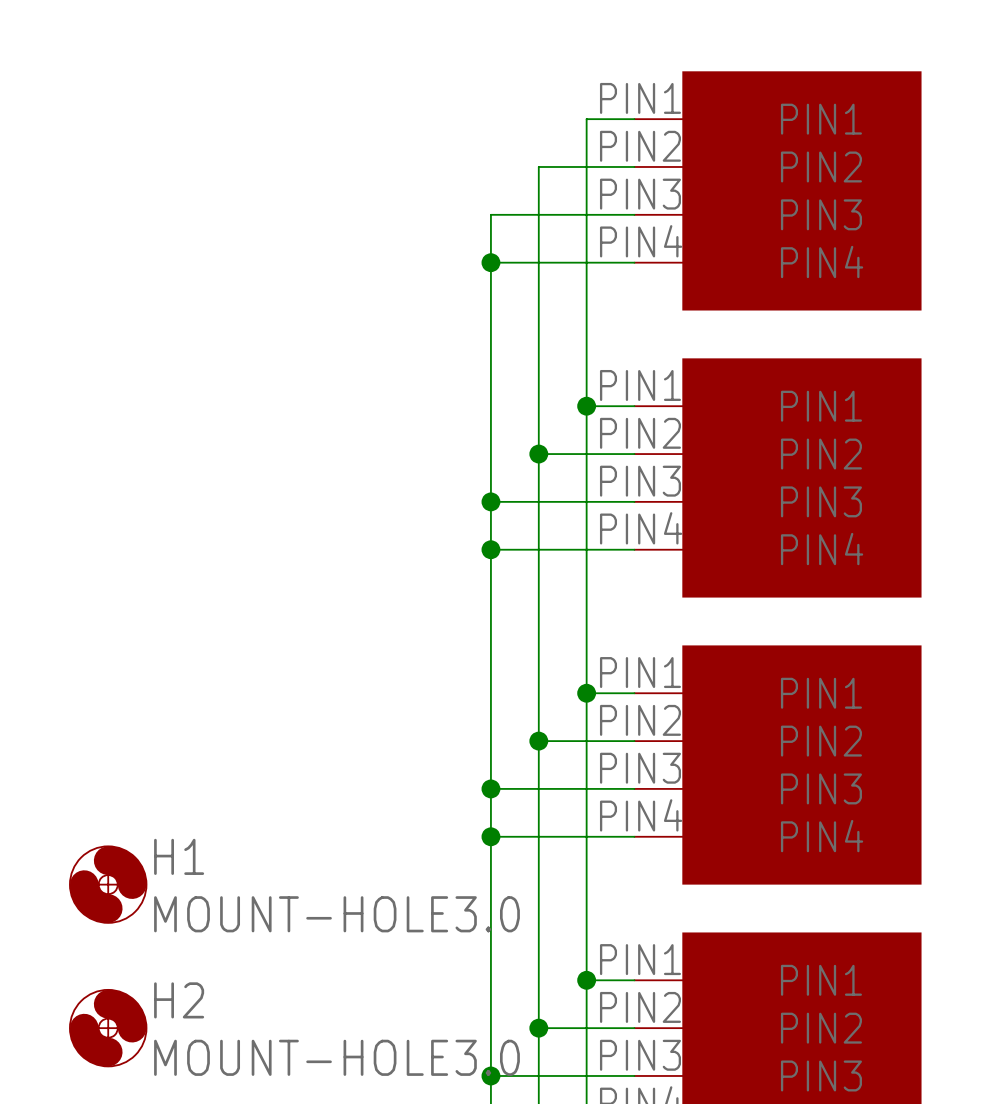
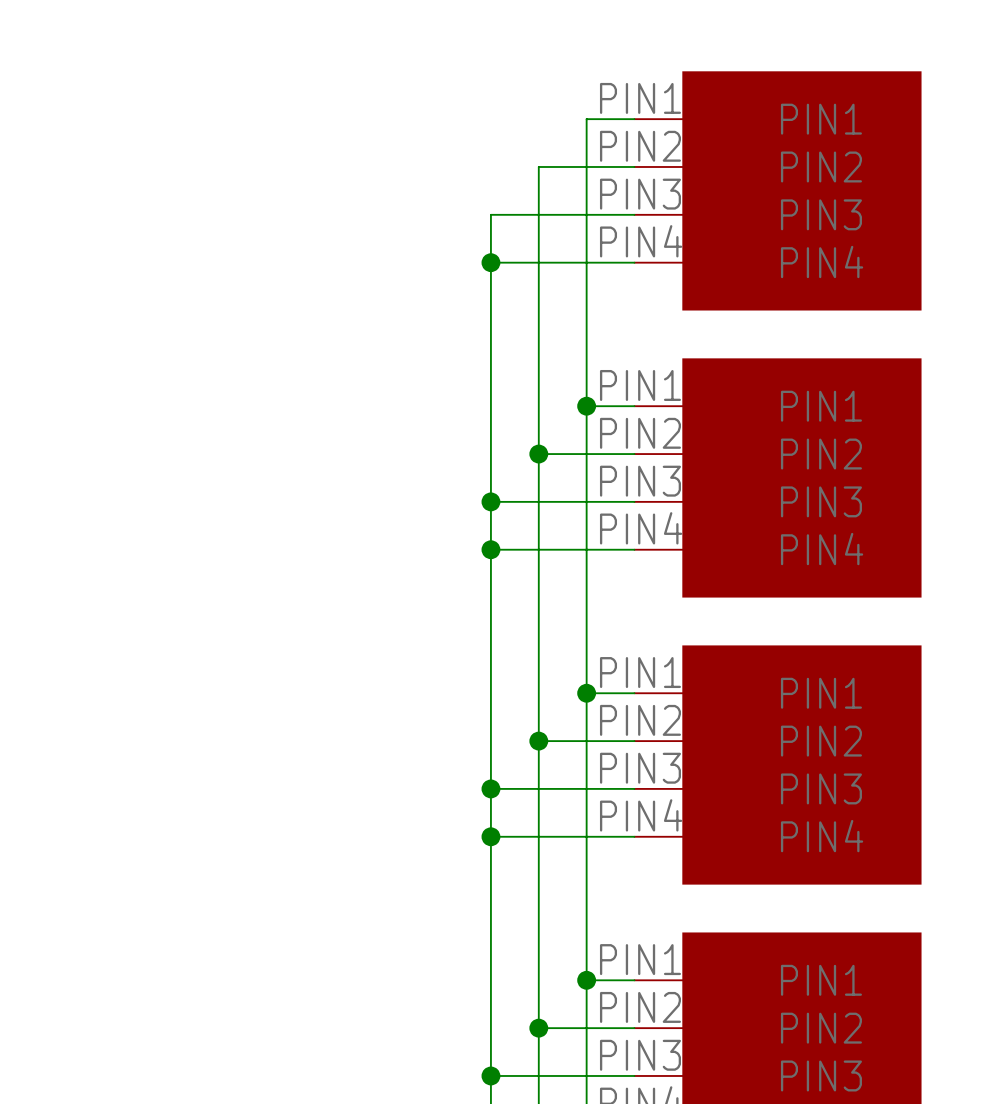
H1: MOUNT-HOLE3.0 (108, 884) -> none
H2: MOUNT-HOLE3.0 (108, 1028) -> none

